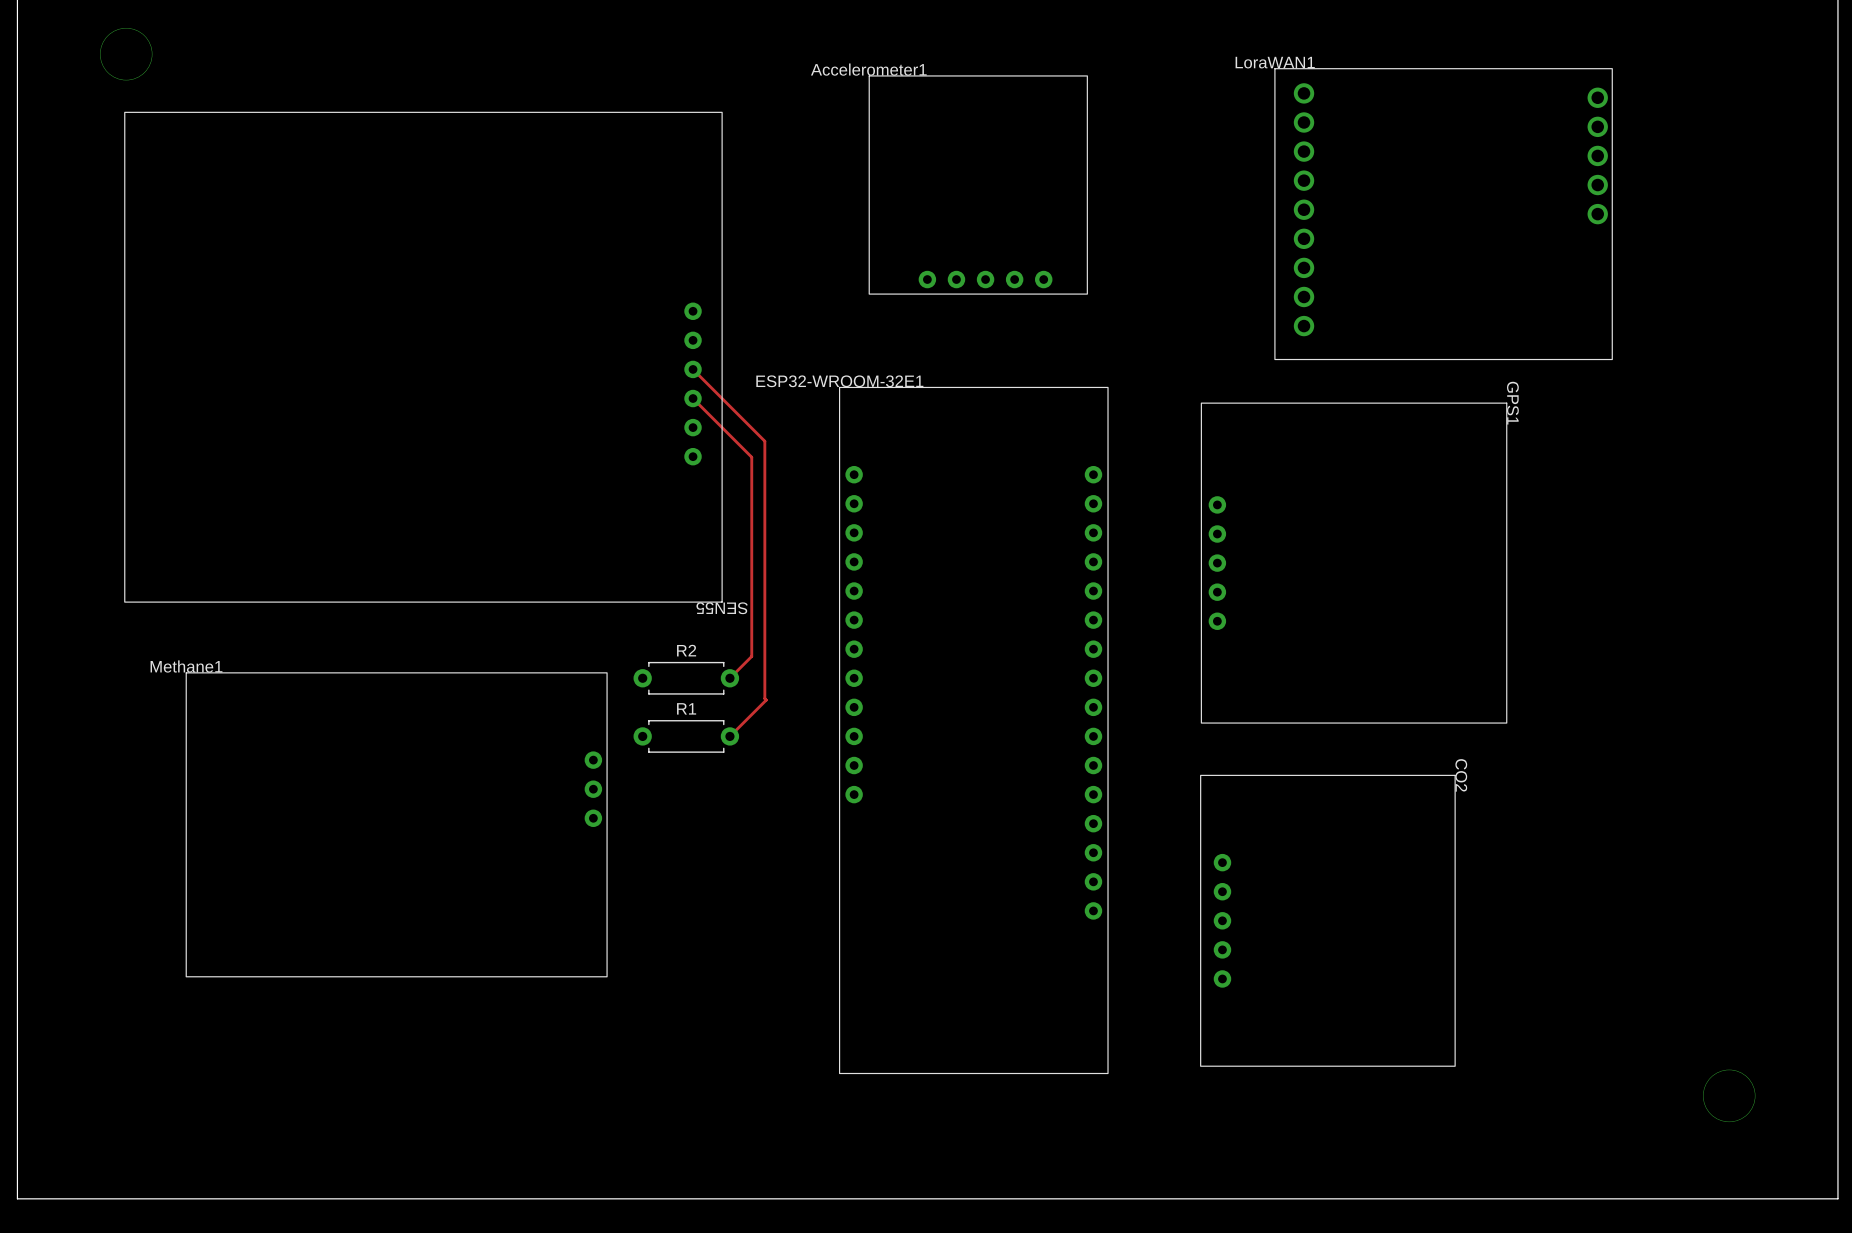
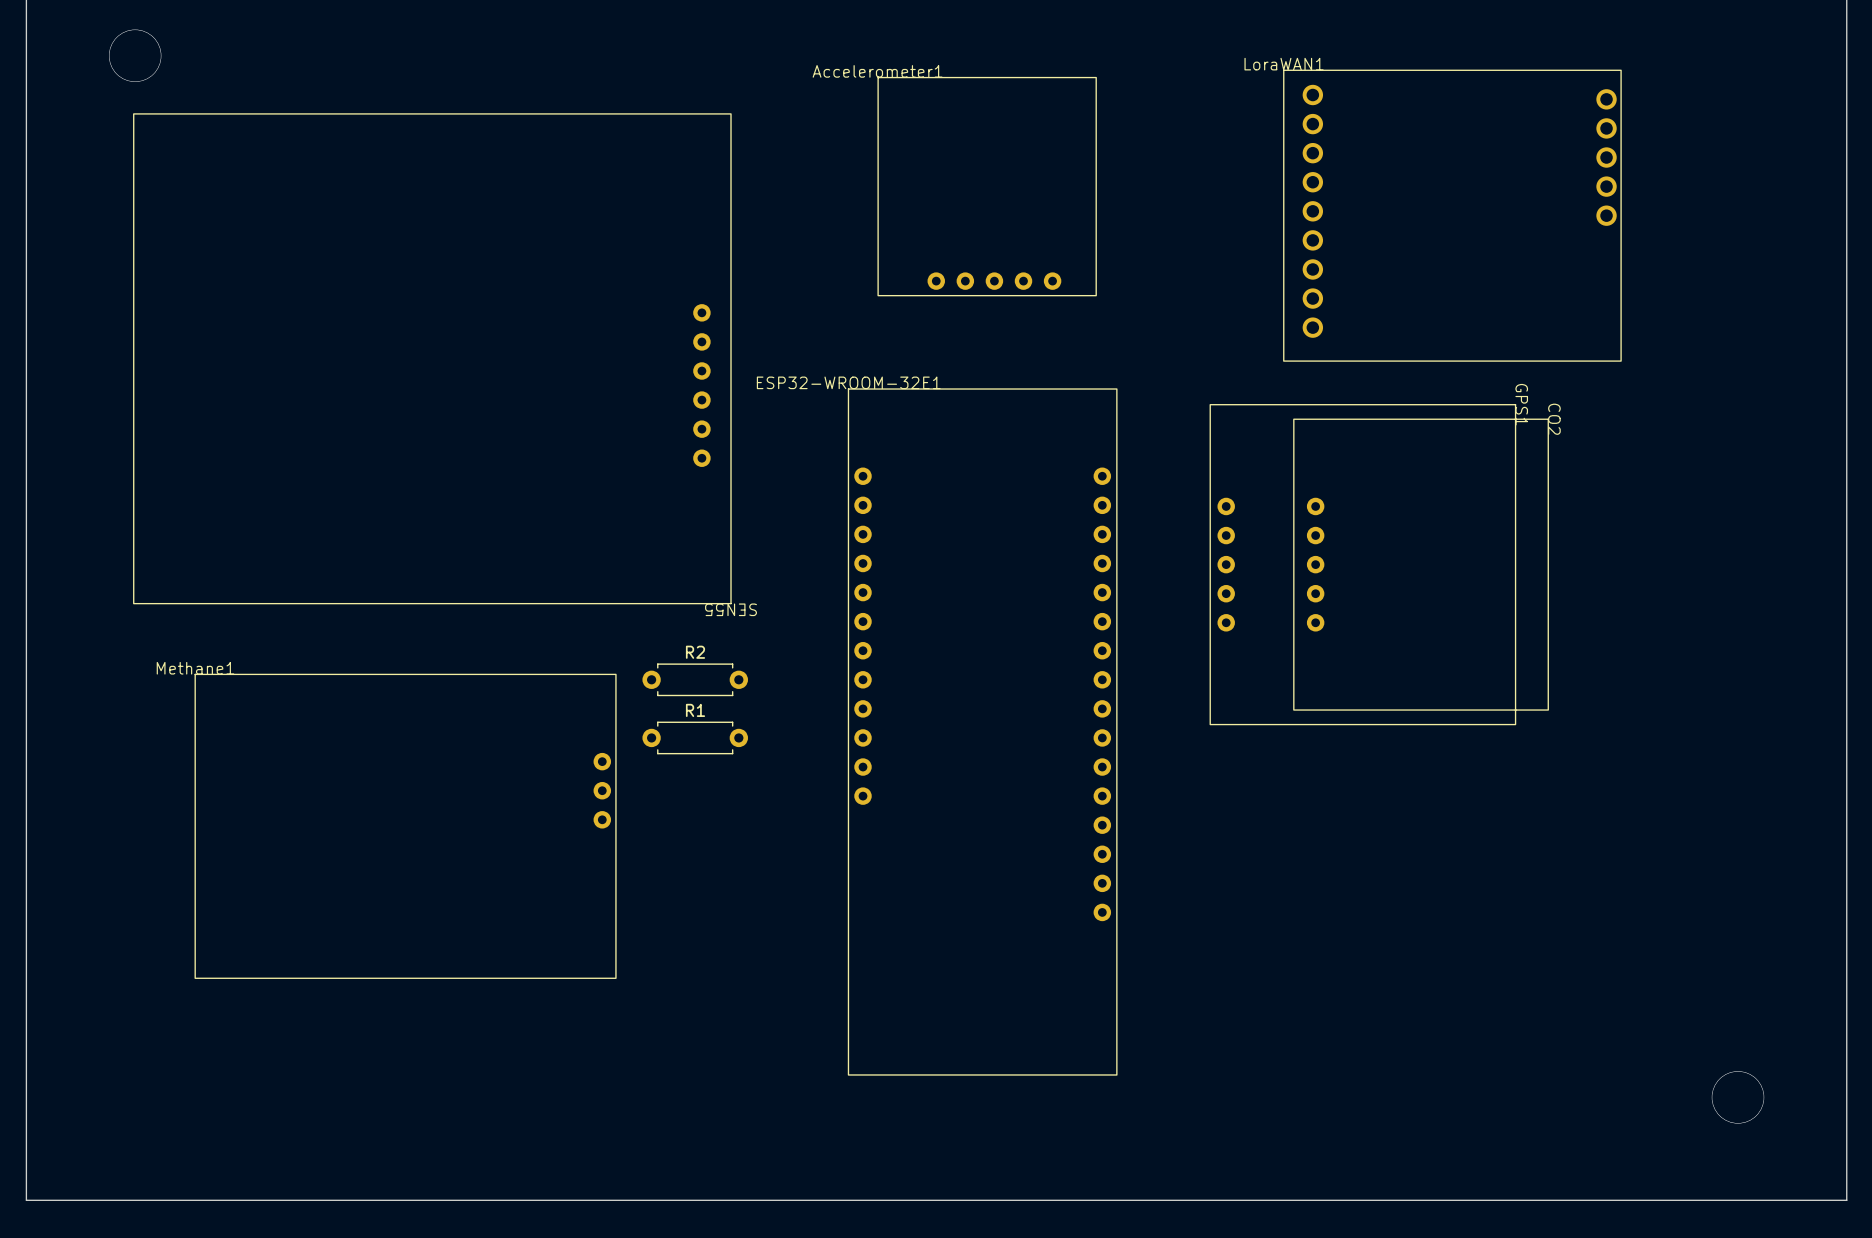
track: (693, 369) (764, 441) (766, 700) (729, 736) -> none
track: (693, 398) (751, 457) (751, 656) (729, 678) -> none
CO2 position: (1327, 920) -> (1421, 564)

